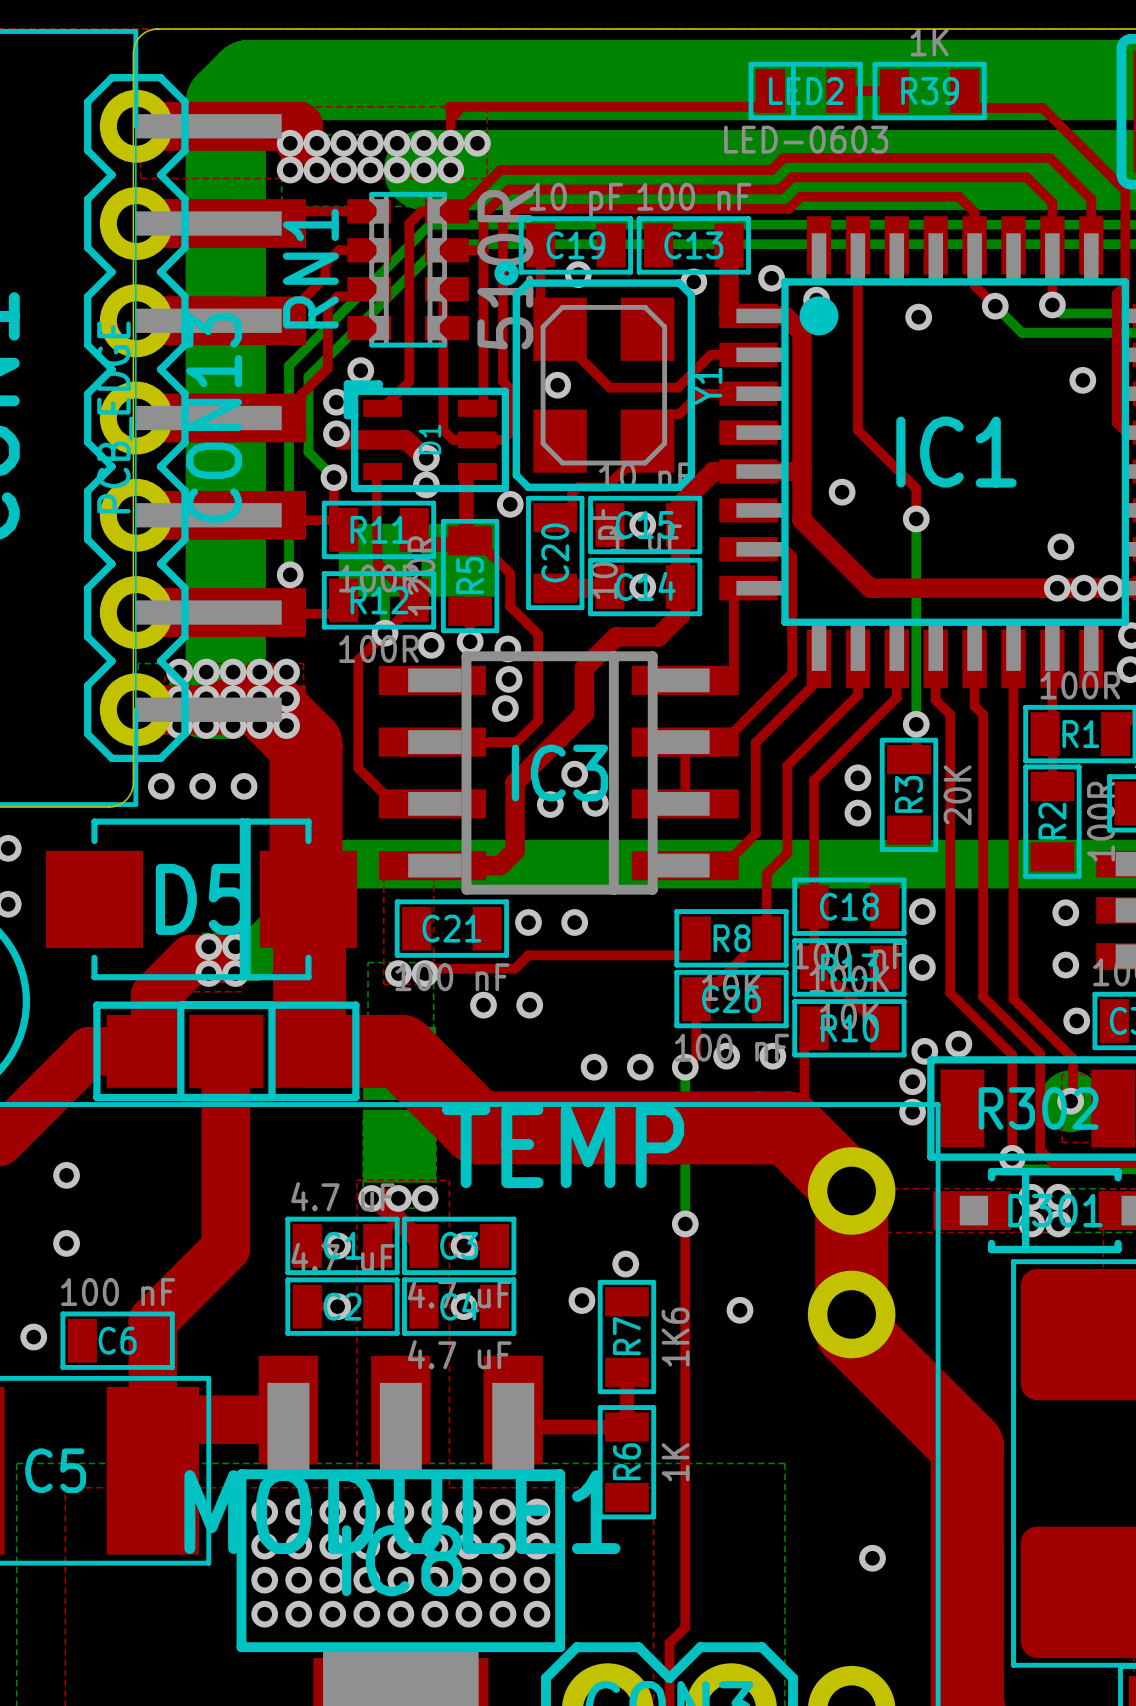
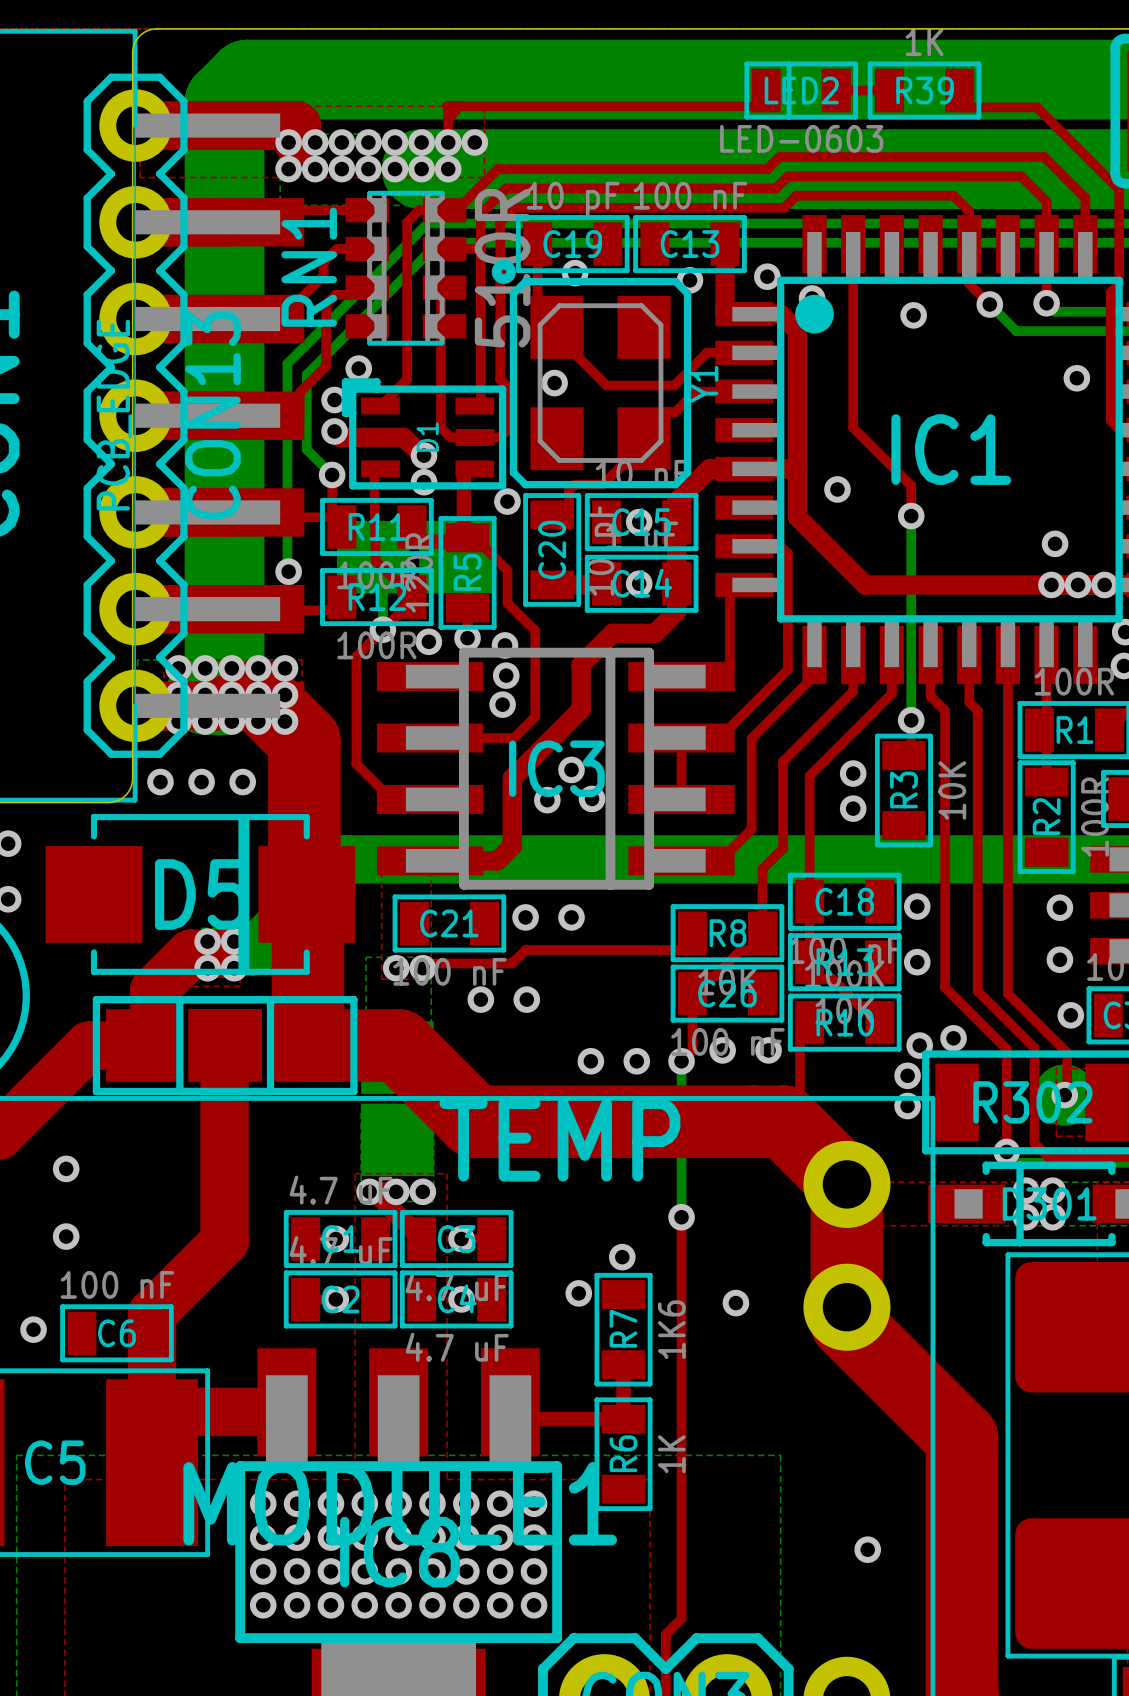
R3 value: 20K (957, 795) -> 10K (952, 790)

